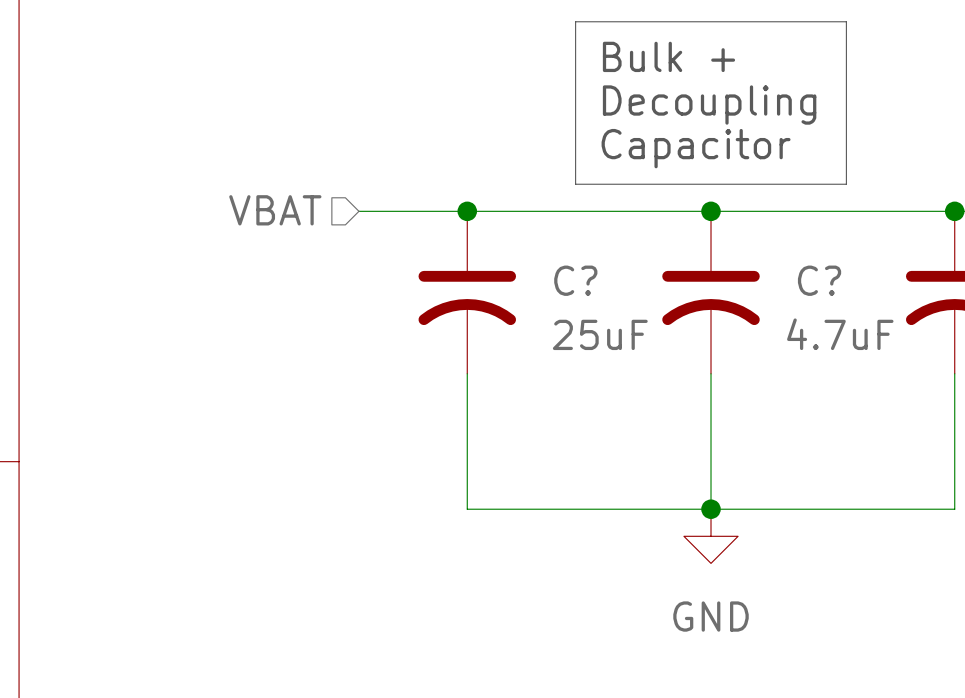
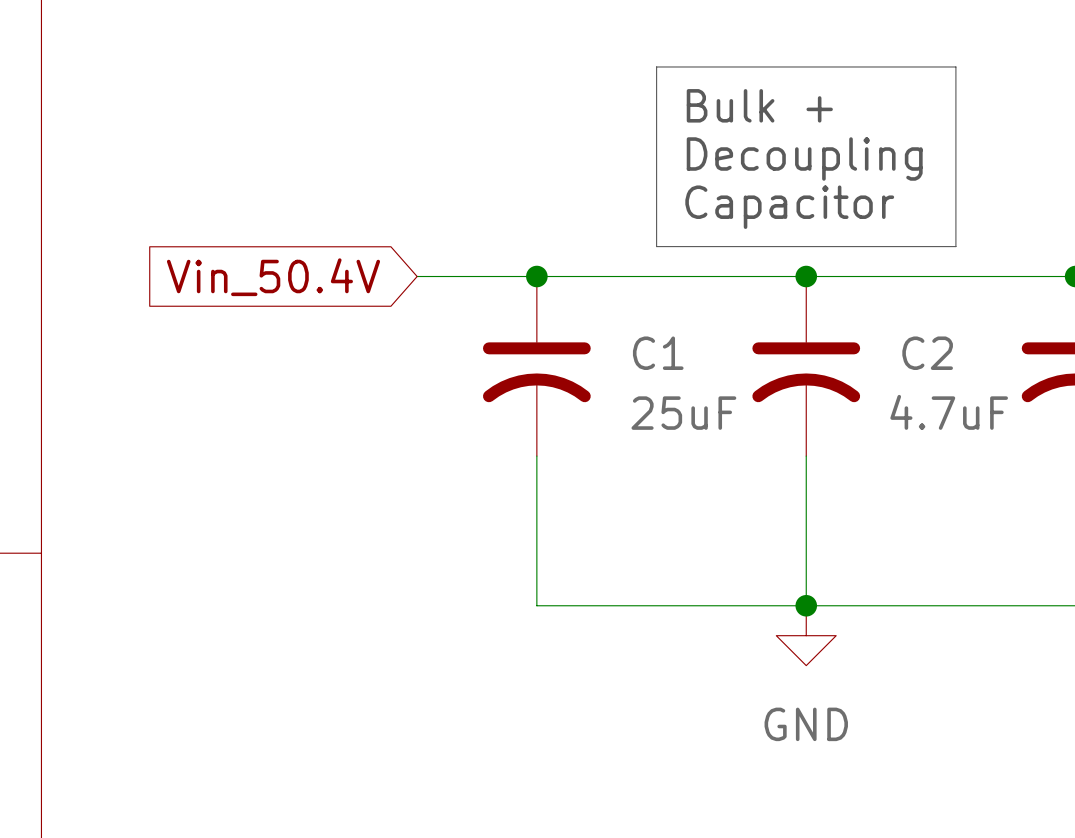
hierarchical label: VBAT (275, 210) -> none
global label: none -> Vin_50.4V (273, 277)
C? name: C? (575, 280) -> C1 (658, 353)
C? name: C? (819, 280) -> C2 (927, 353)

